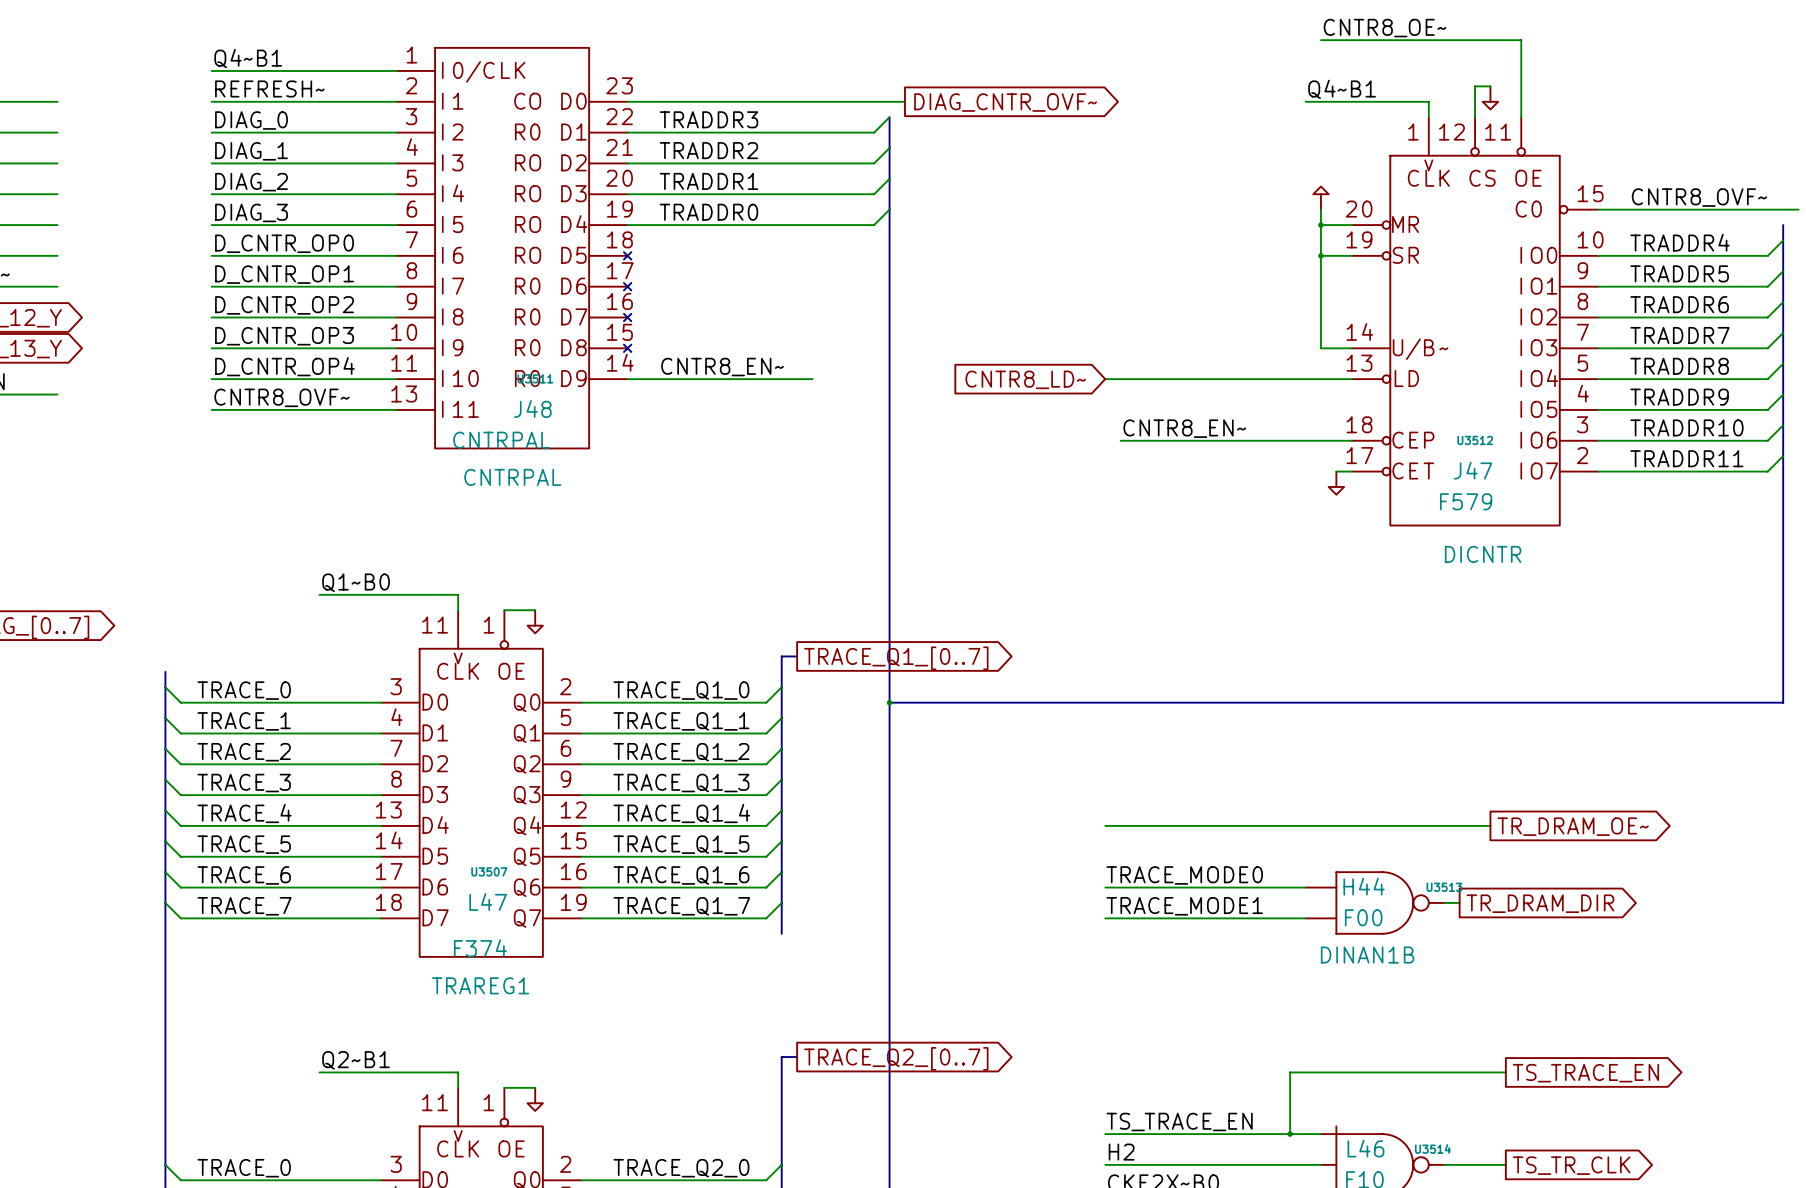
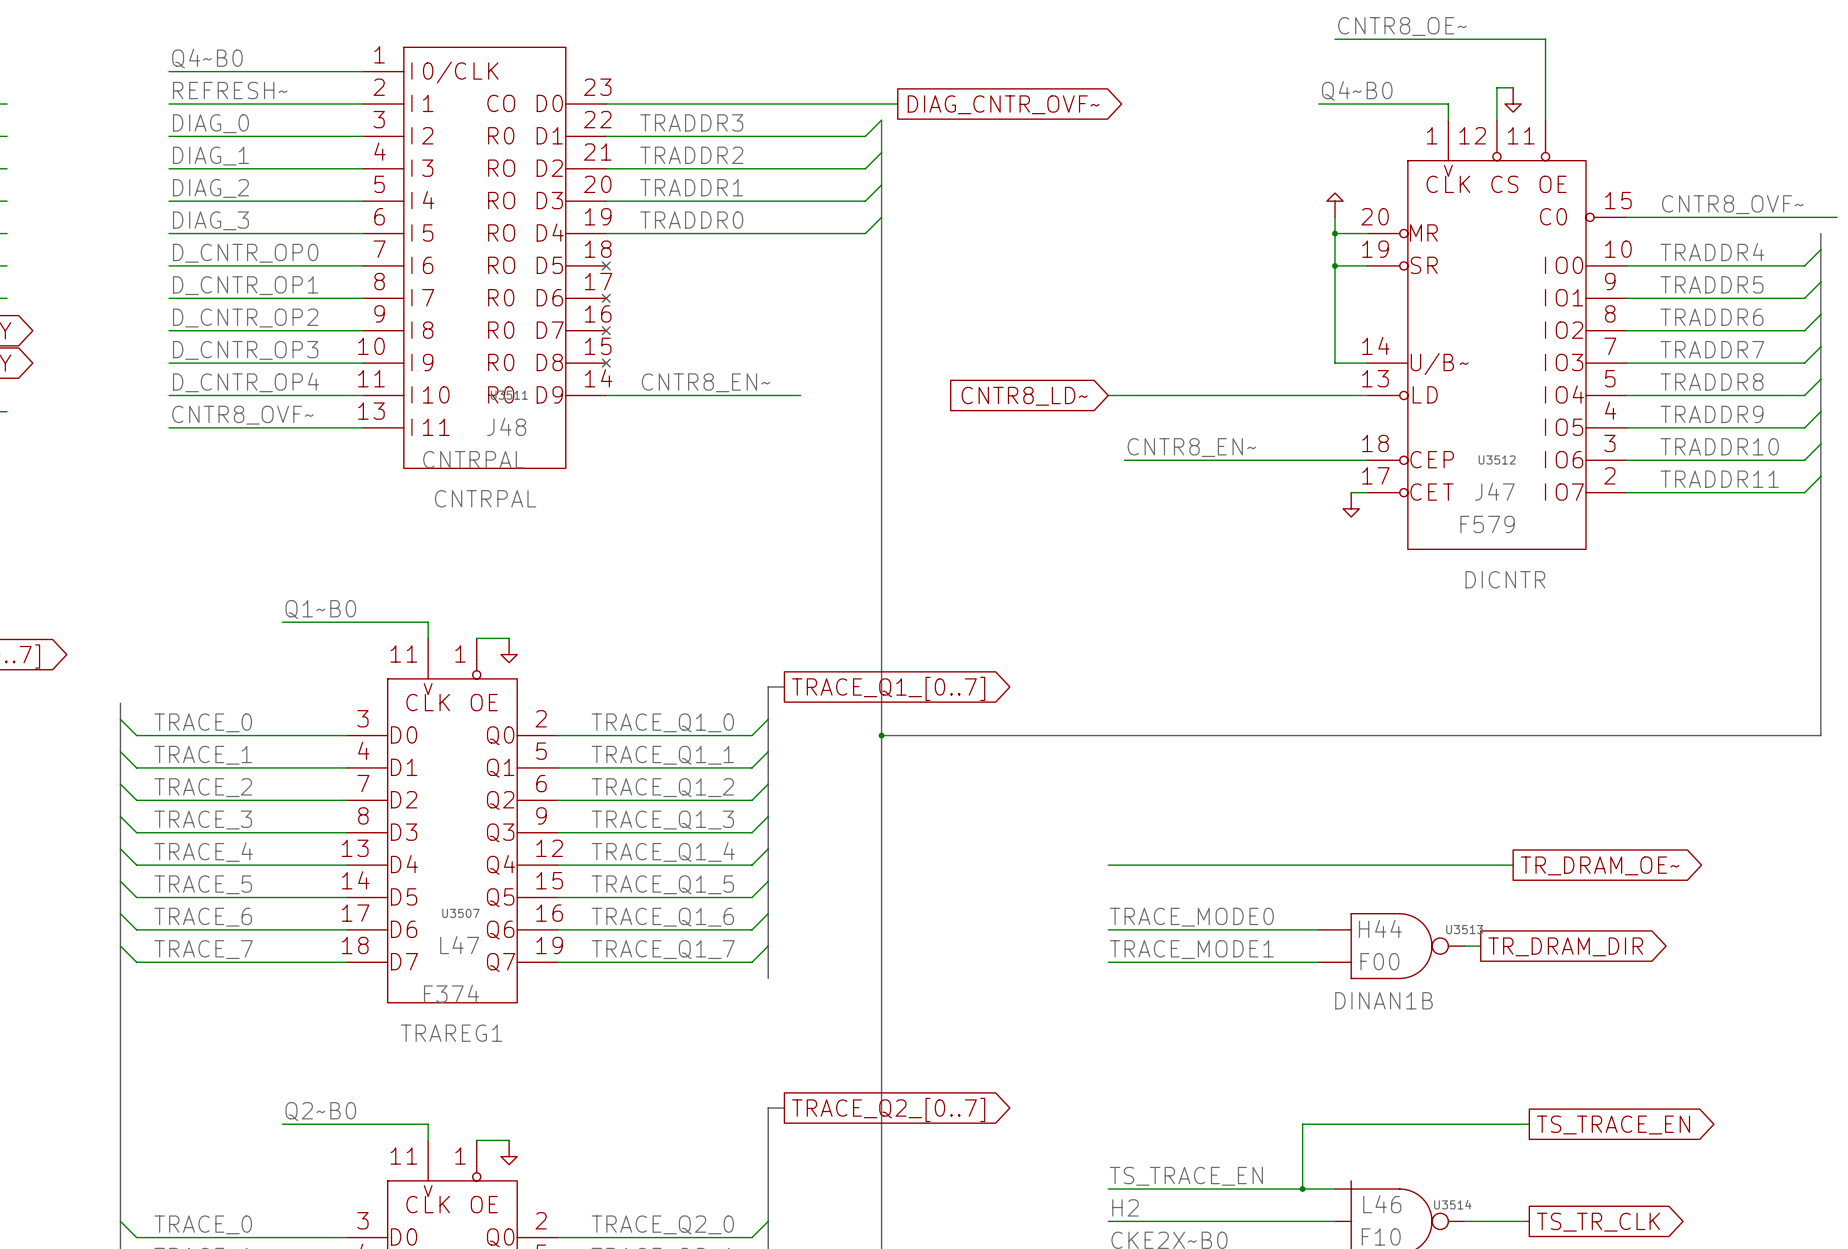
label: Q4~B1 (248, 58) -> Q4~B0 (207, 58)
label: Q4~B1 (1342, 89) -> Q4~B0 (1357, 90)
label: Q2~B1 (356, 1060) -> Q2~B0 (320, 1111)

